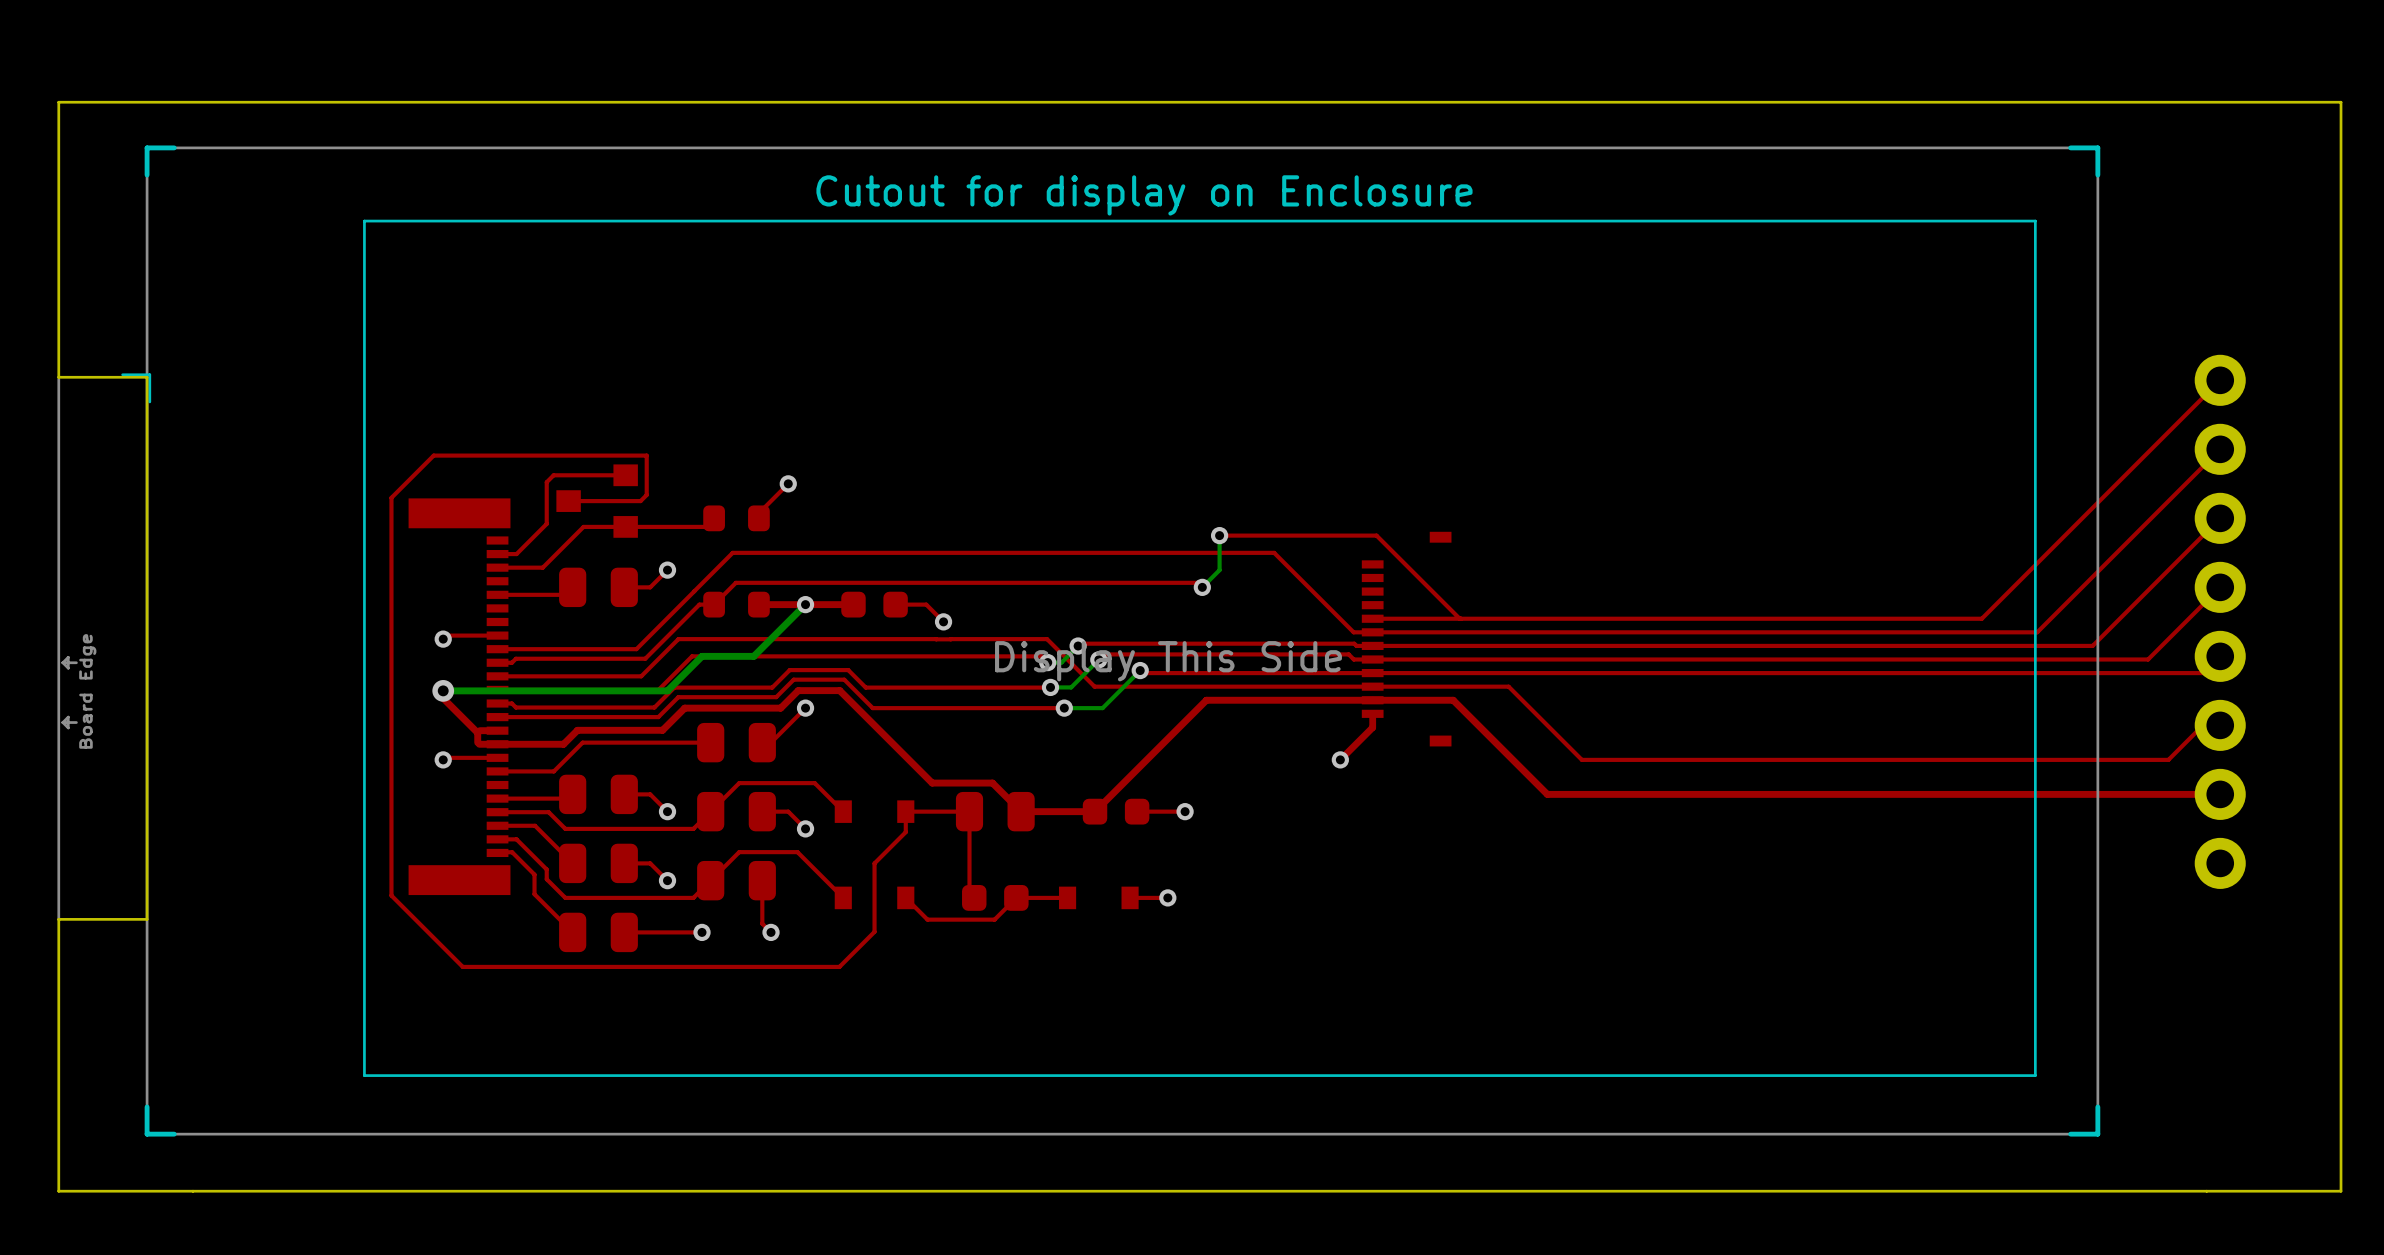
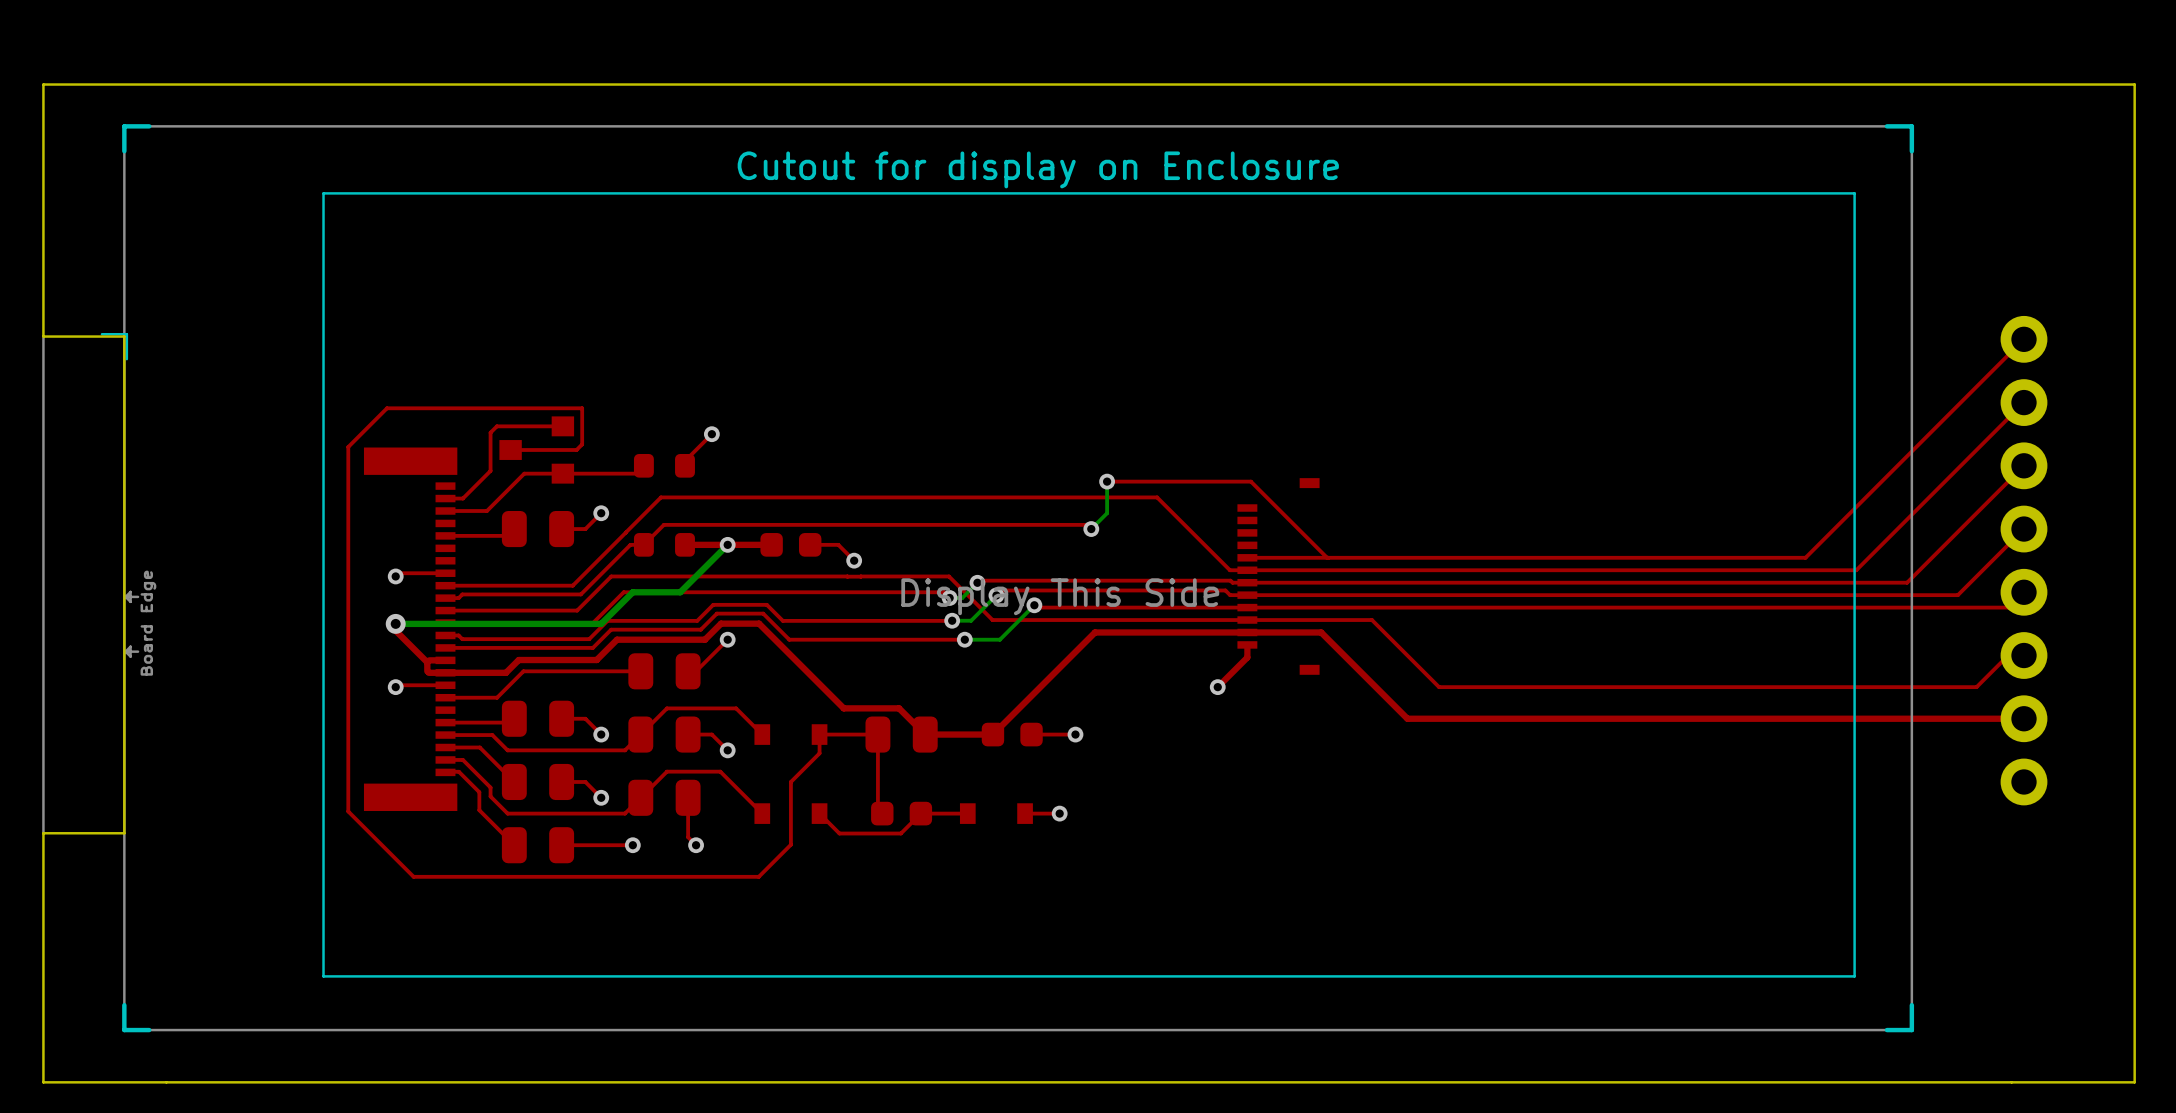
part footprint: [57, 145, 2101, 1137] -> [42, 124, 1915, 1033]

